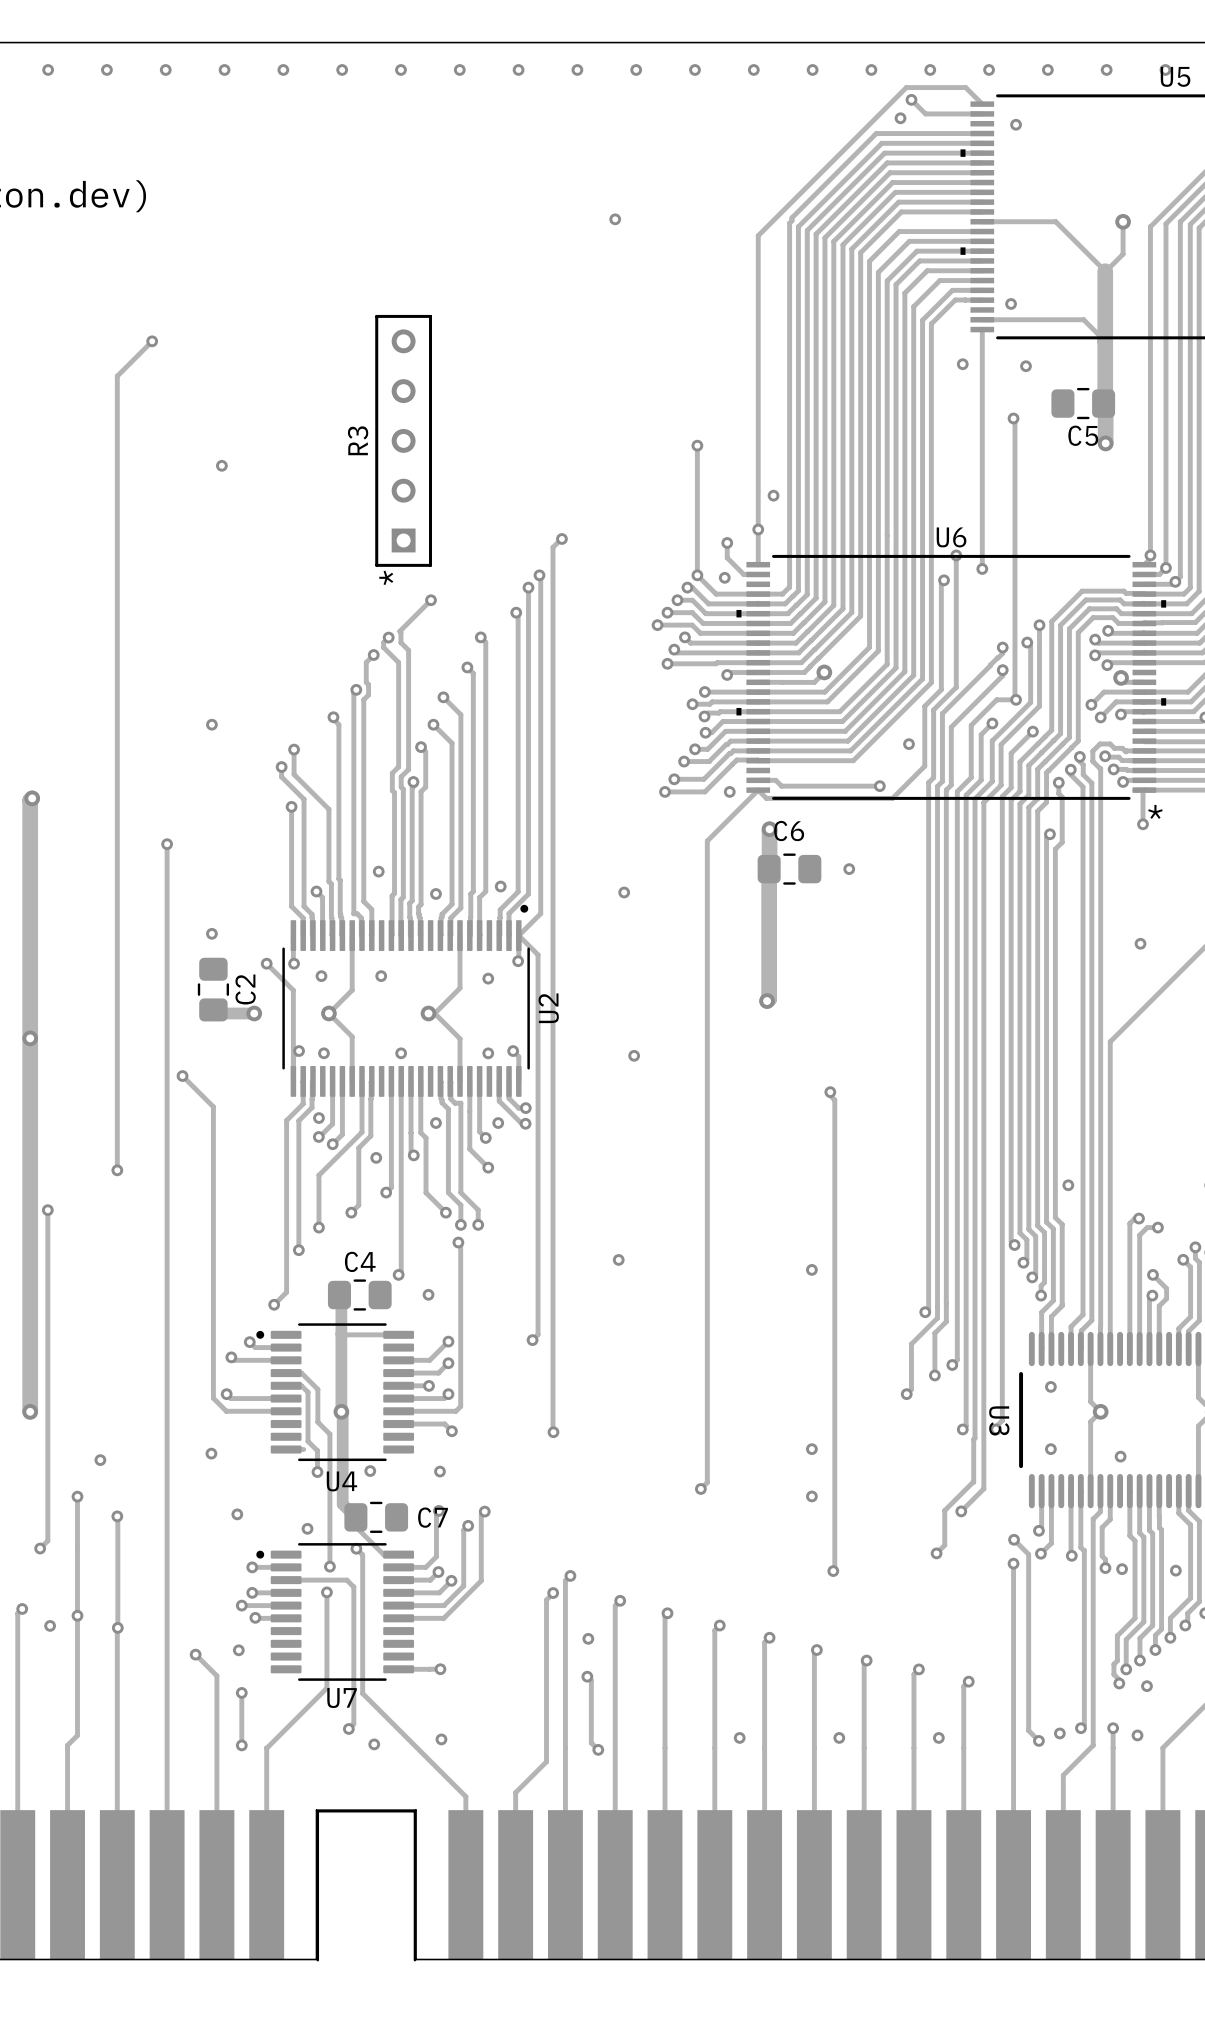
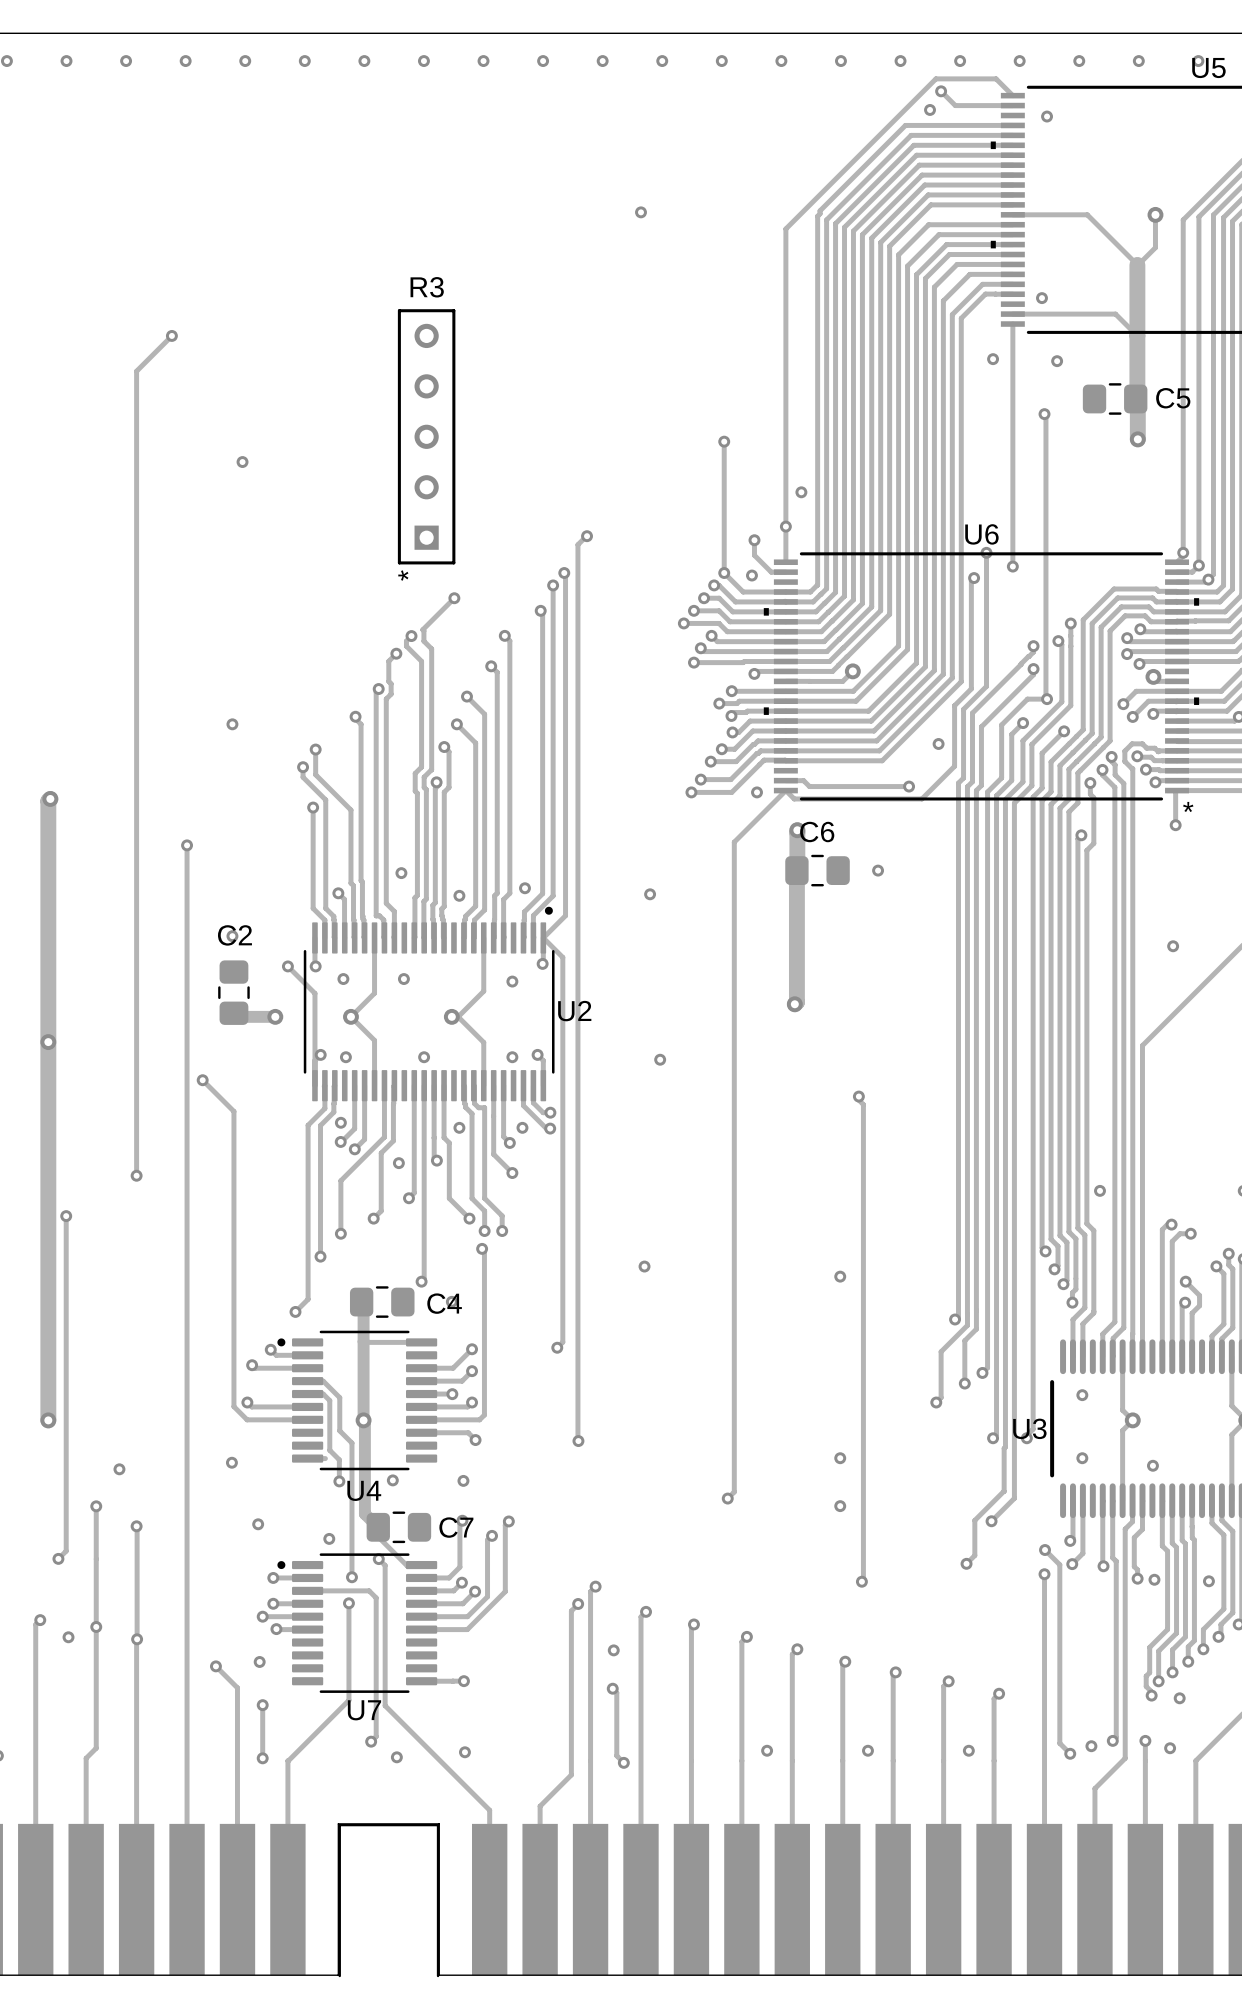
C5 name position: C5 (1083, 435) -> C5 (1173, 398)
R3 name rotation: 0° (358, 440) -> 90° clockwise (427, 287)
R3 name position: R3 (358, 440) -> R3 (427, 287)
C2 name rotation: 0° (245, 989) -> 90° clockwise (234, 935)
C2 name position: C2 (245, 989) -> C2 (234, 935)
U2 name rotation: 0° (548, 1008) -> 90° clockwise (574, 1011)
C4 name position: C4 (360, 1261) -> C4 (444, 1303)
U3 name rotation: 0° (999, 1420) -> 90° counterclockwise (1029, 1428)

